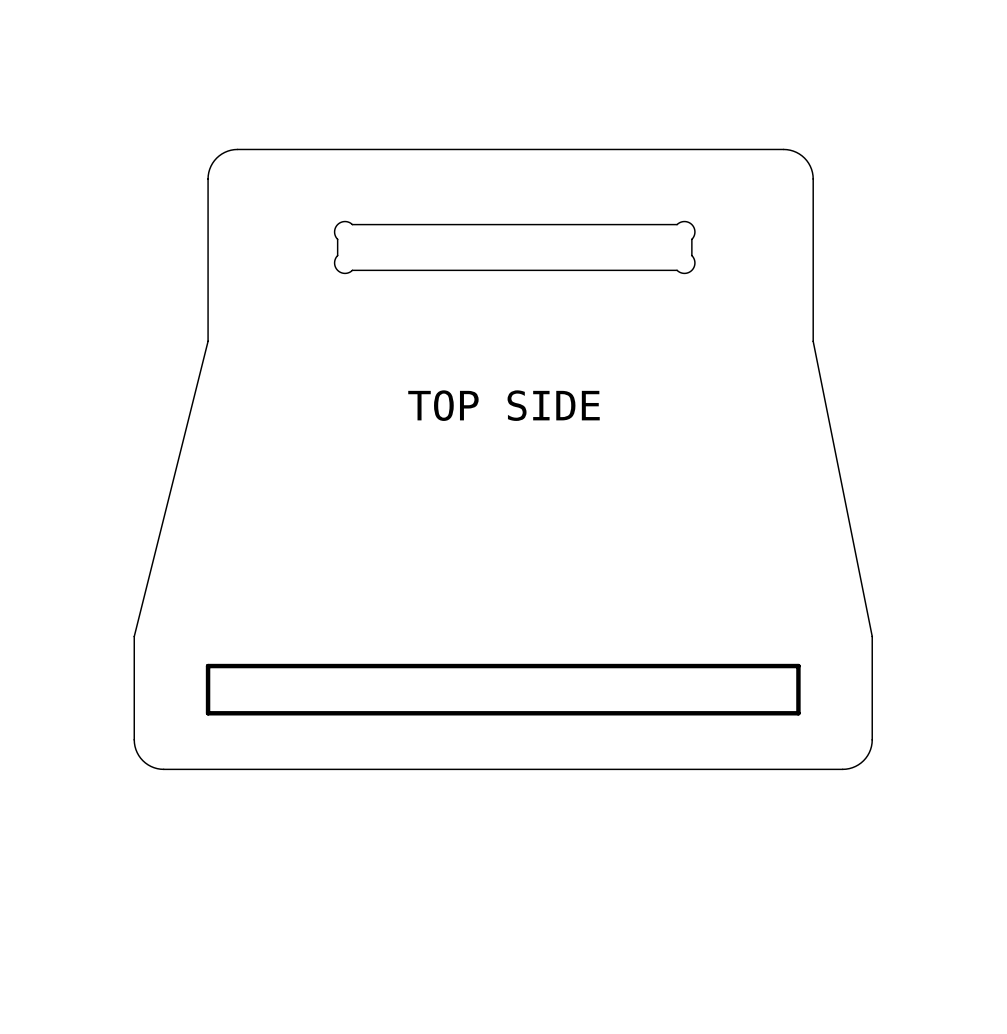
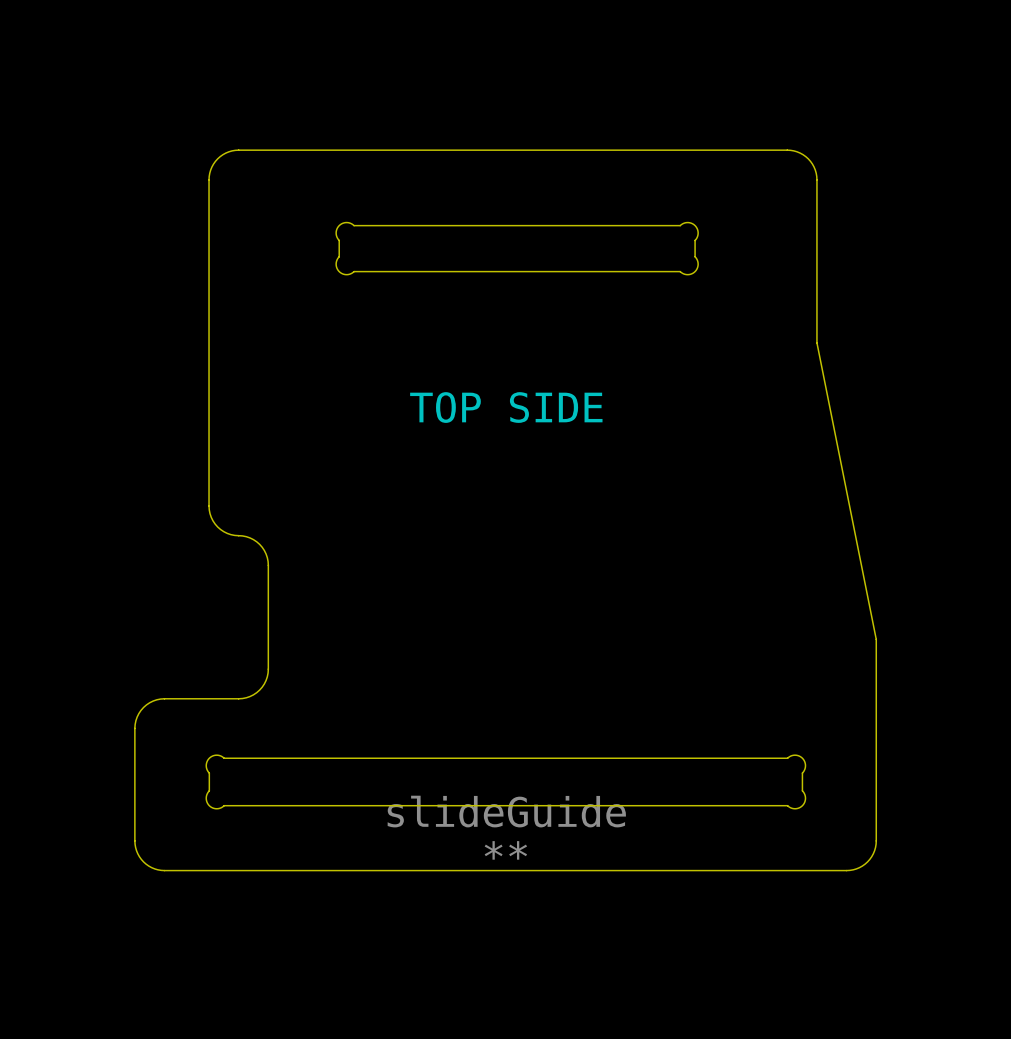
board edge: (208, 341) (134, 636) (134, 725) -> (209, 342) (209, 509) (212, 520) (220, 529) (231, 534) (253, 539) (259, 544) (266, 553) (268, 565) (268, 673) (264, 683) (259, 690) (246, 697) (164, 698) (153, 701) (141, 710) (135, 720) (134, 728)
board edge: (208, 666) (798, 666) (798, 713) (208, 713) (208, 666) -> none
board edge: (134, 739) (135, 749) (142, 760) (154, 767) (163, 769) (842, 769) (855, 766) (863, 760) (870, 749) (872, 739) -> (134, 743) (135, 847) (139, 856) (146, 864) (154, 868) (164, 870) (853, 869) (867, 861) (875, 847) (876, 743)
part: none -> slideGuide (505, 781)

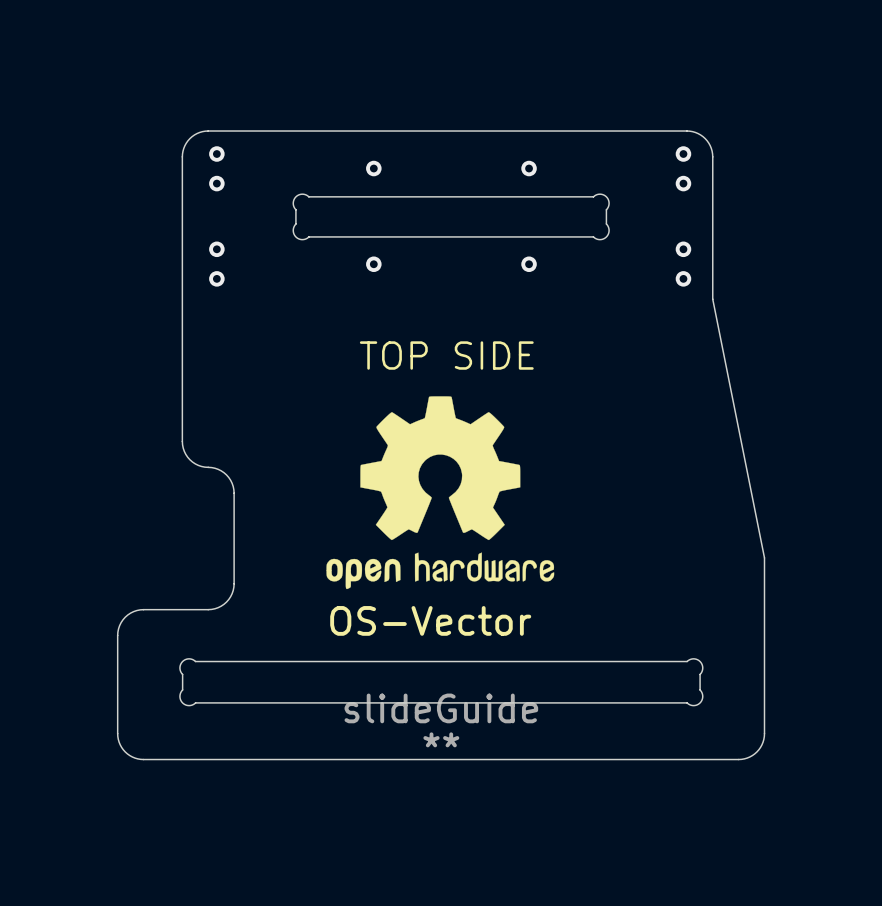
via: none -> (216, 154)
via: none -> (683, 154)
via: none -> (373, 168)
via: none -> (529, 168)
via: none -> (216, 183)
via: none -> (683, 183)
via: none -> (216, 249)
via: none -> (683, 249)
via: none -> (373, 264)
via: none -> (529, 264)
via: none -> (216, 278)
via: none -> (683, 278)
drawing: none -> [326, 396, 555, 590]
text: none -> OS-Vector (430, 620)

